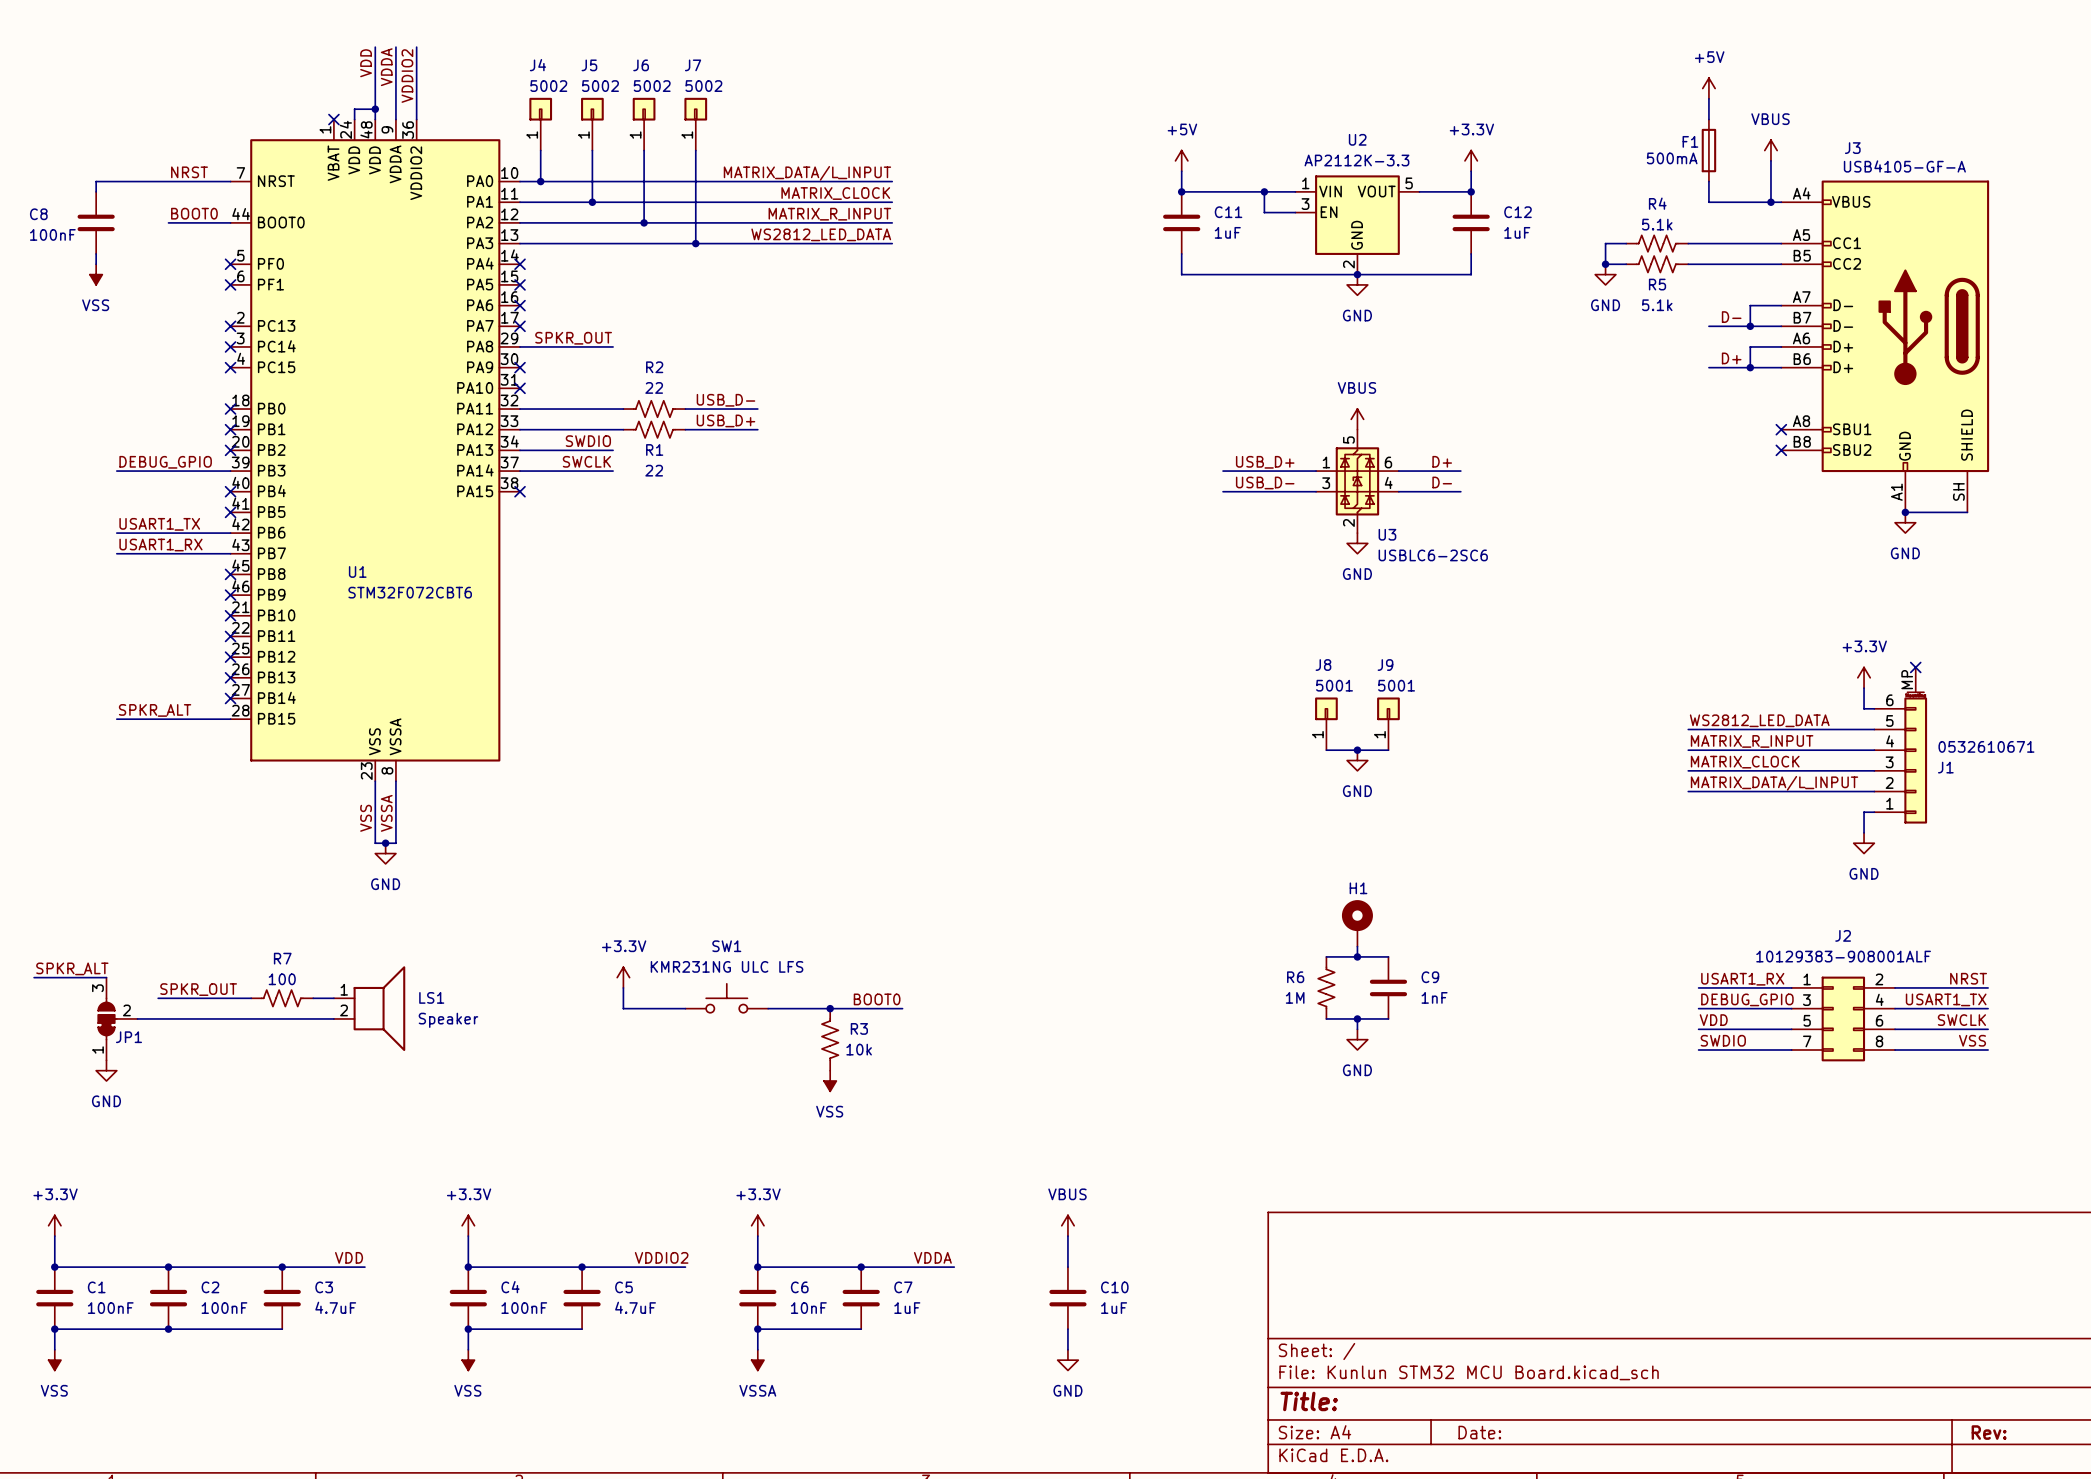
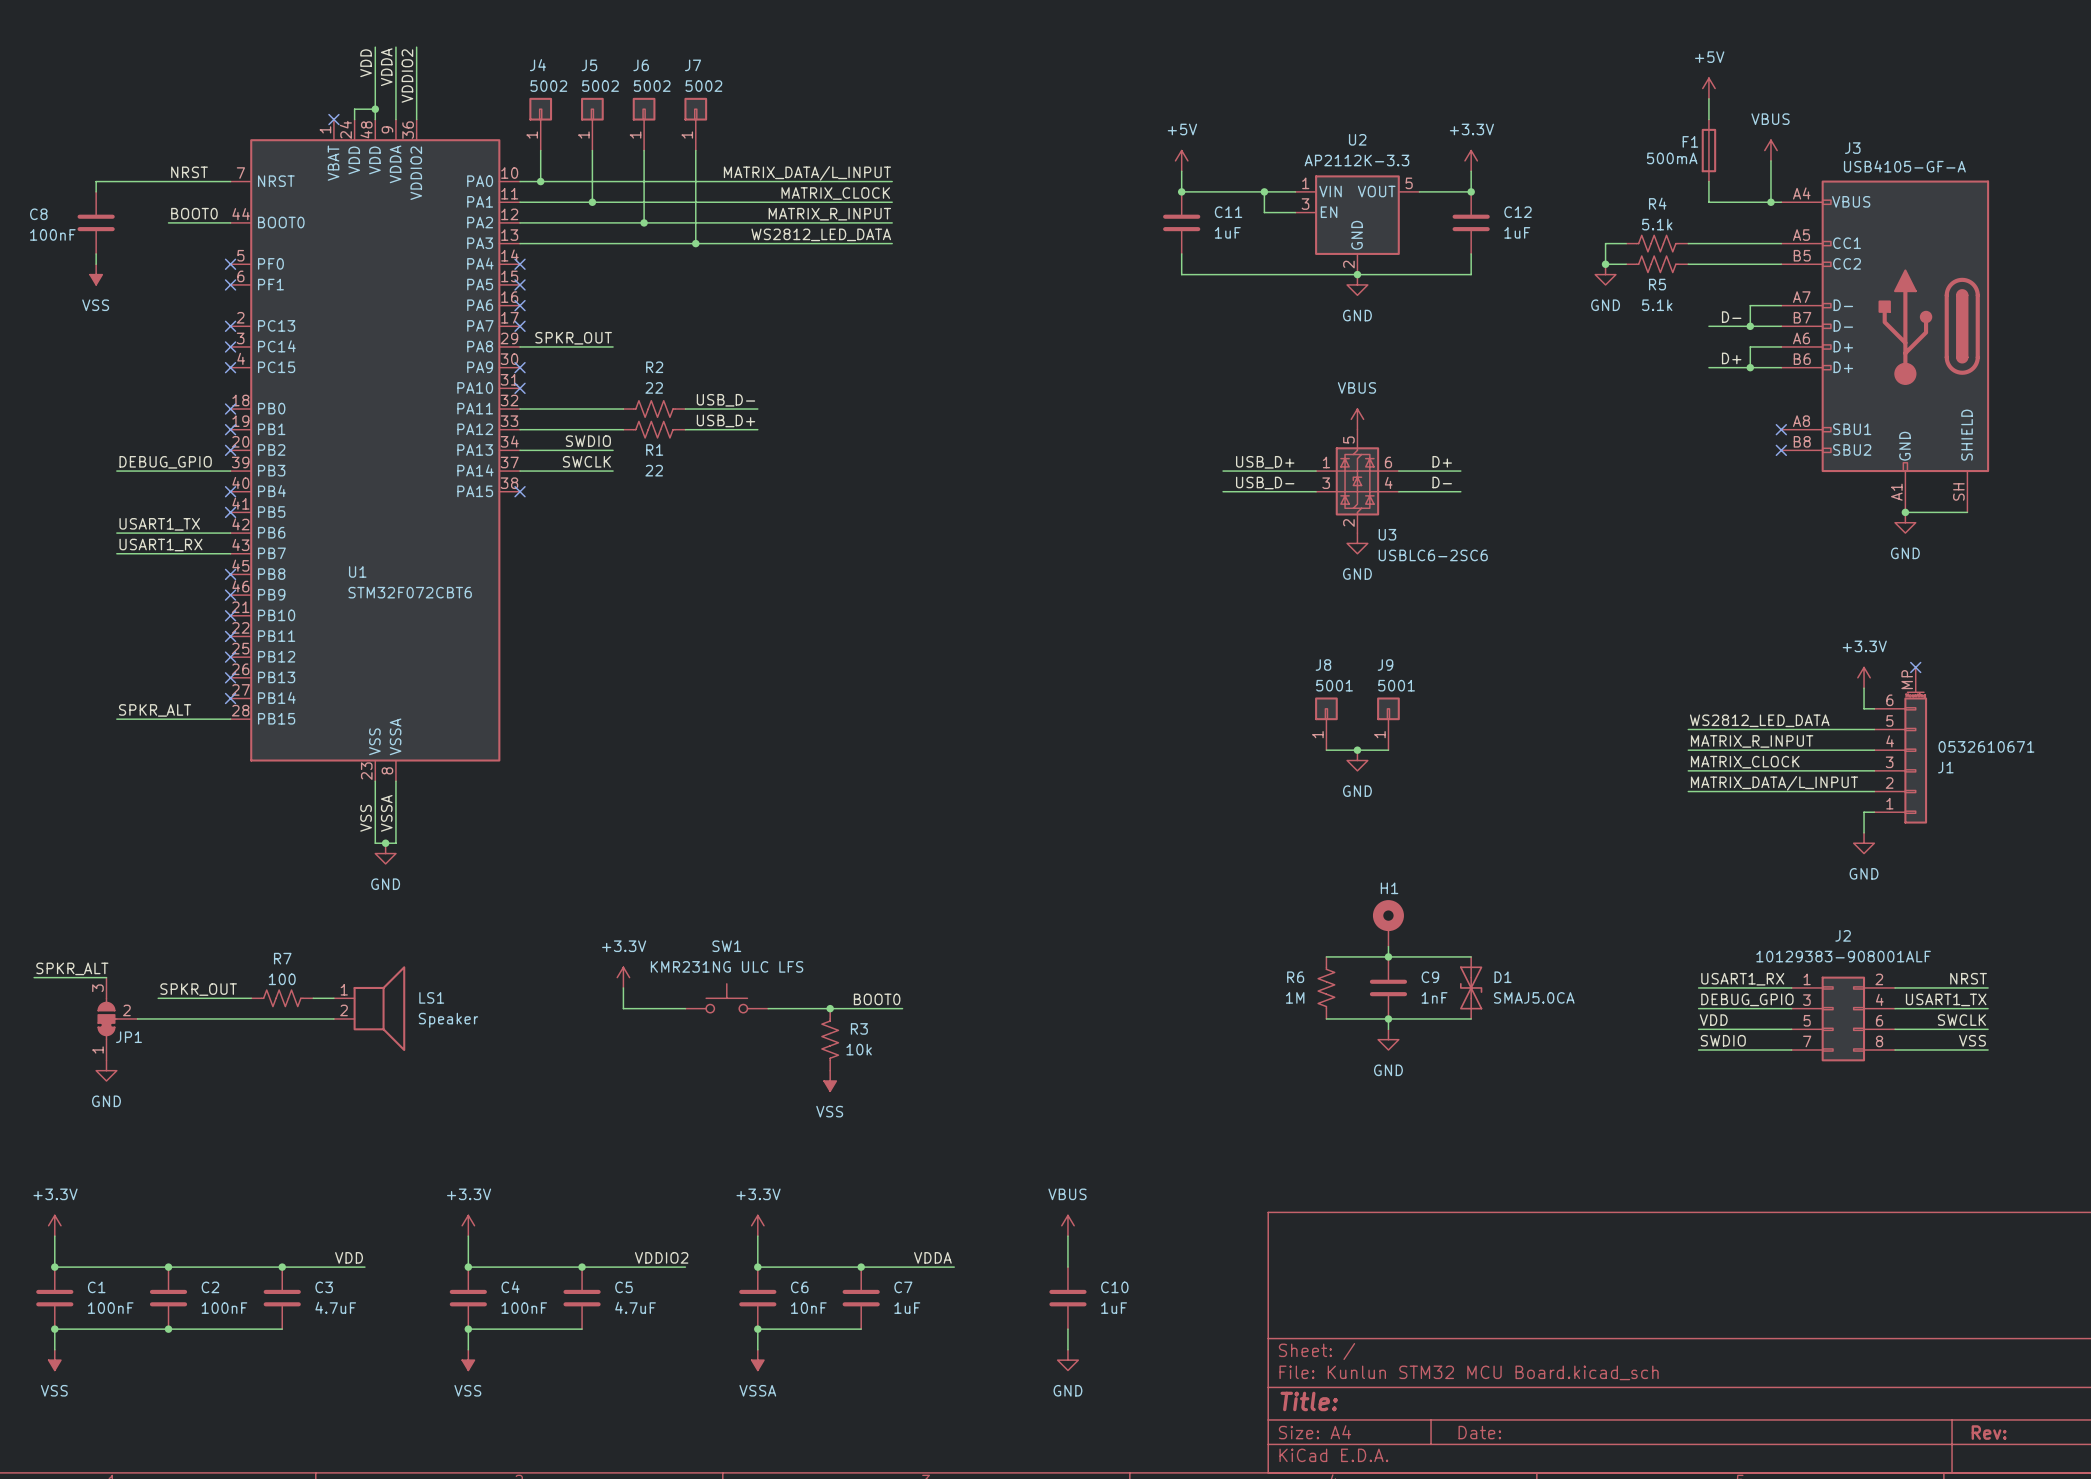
H1 position: (1357, 923) -> (1388, 923)
wire: (1357, 946) (1357, 956) -> none
wire: none -> (1388, 946) (1388, 956) (1471, 956)
junction position: (1357, 956) -> (1388, 956)
D1: none -> SMAJ5.0CA (1471, 987)
wire: (1357, 1018) (1357, 1029) -> none
junction position: (1357, 1018) -> (1388, 1018)
wire: none -> (1471, 1018) (1388, 1018) (1388, 1029)
power symbol position: GND (1357, 1039) -> GND (1388, 1039)

